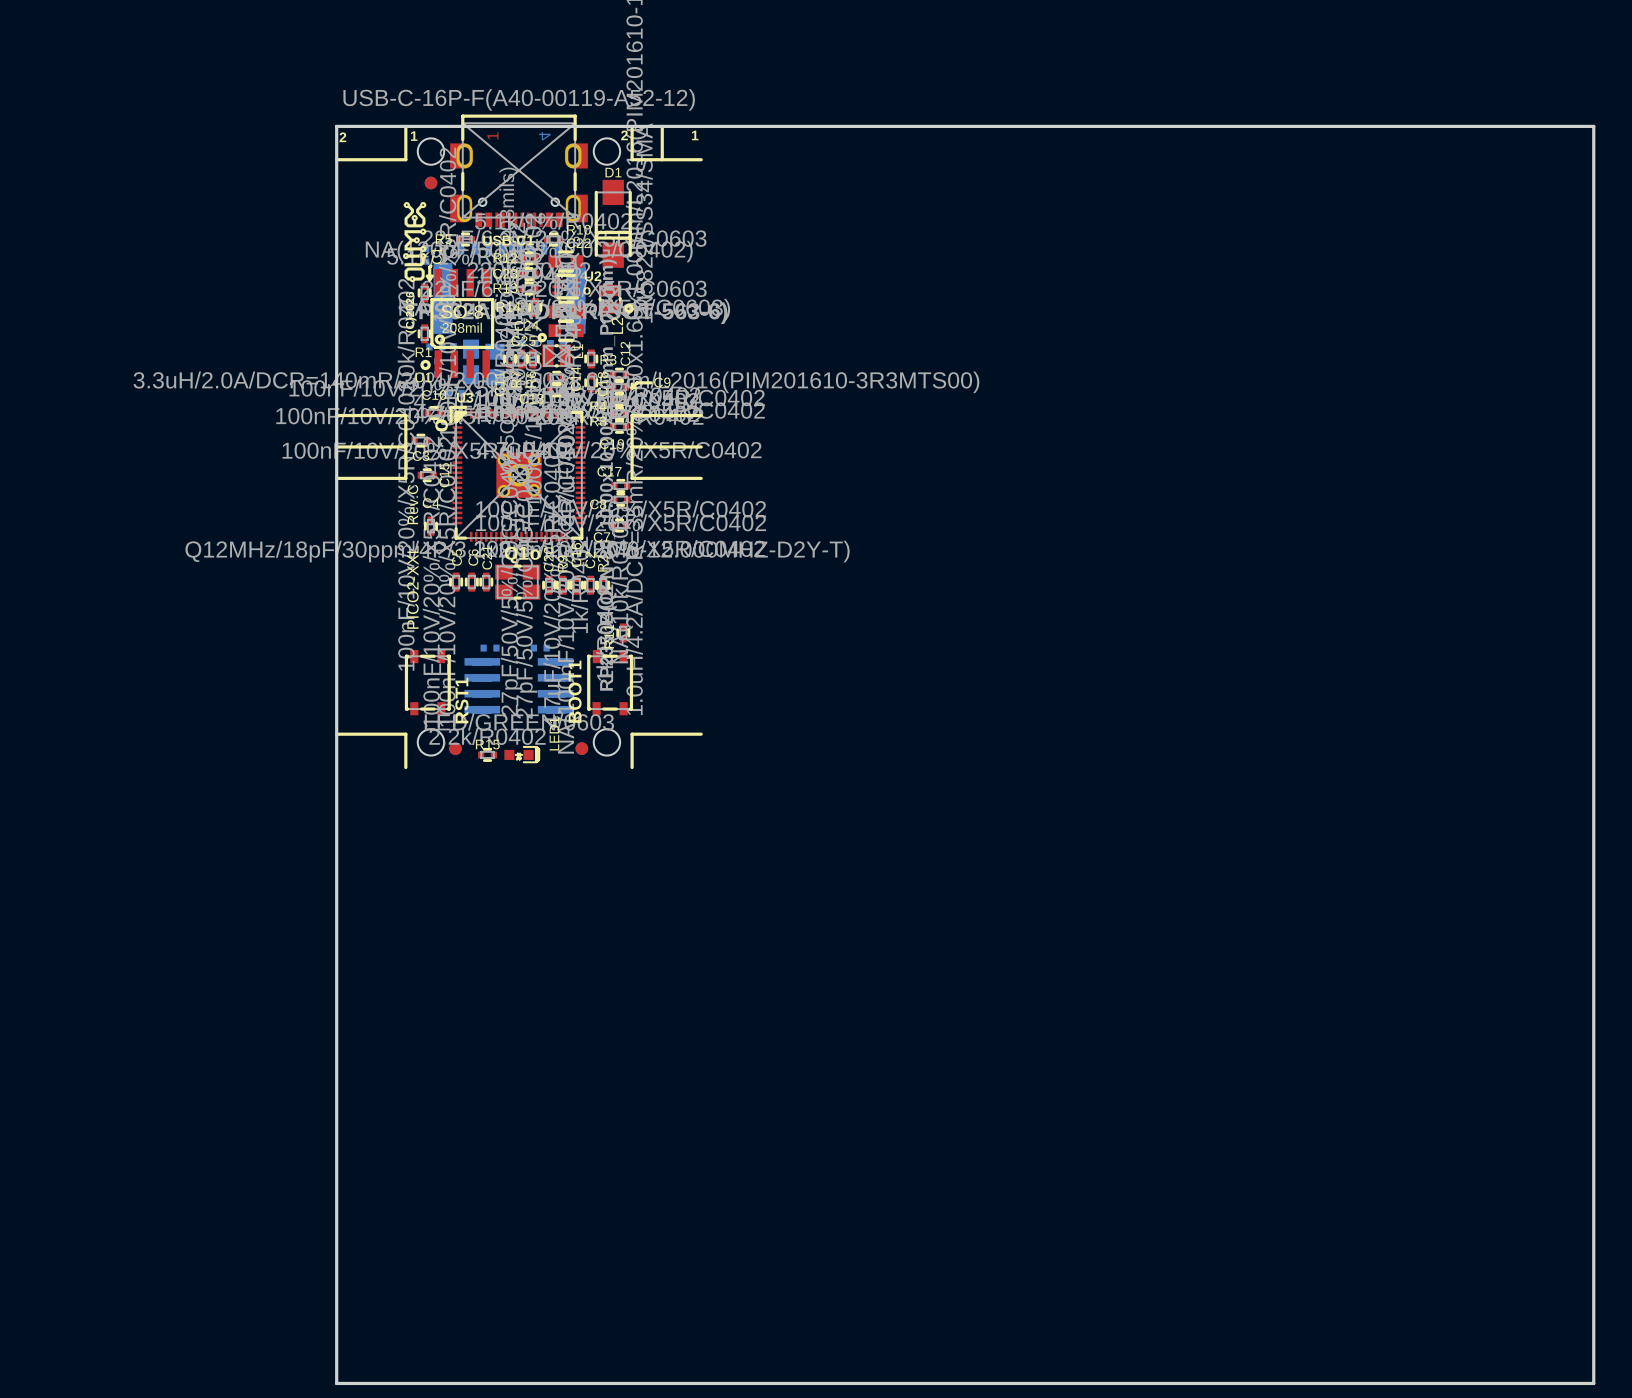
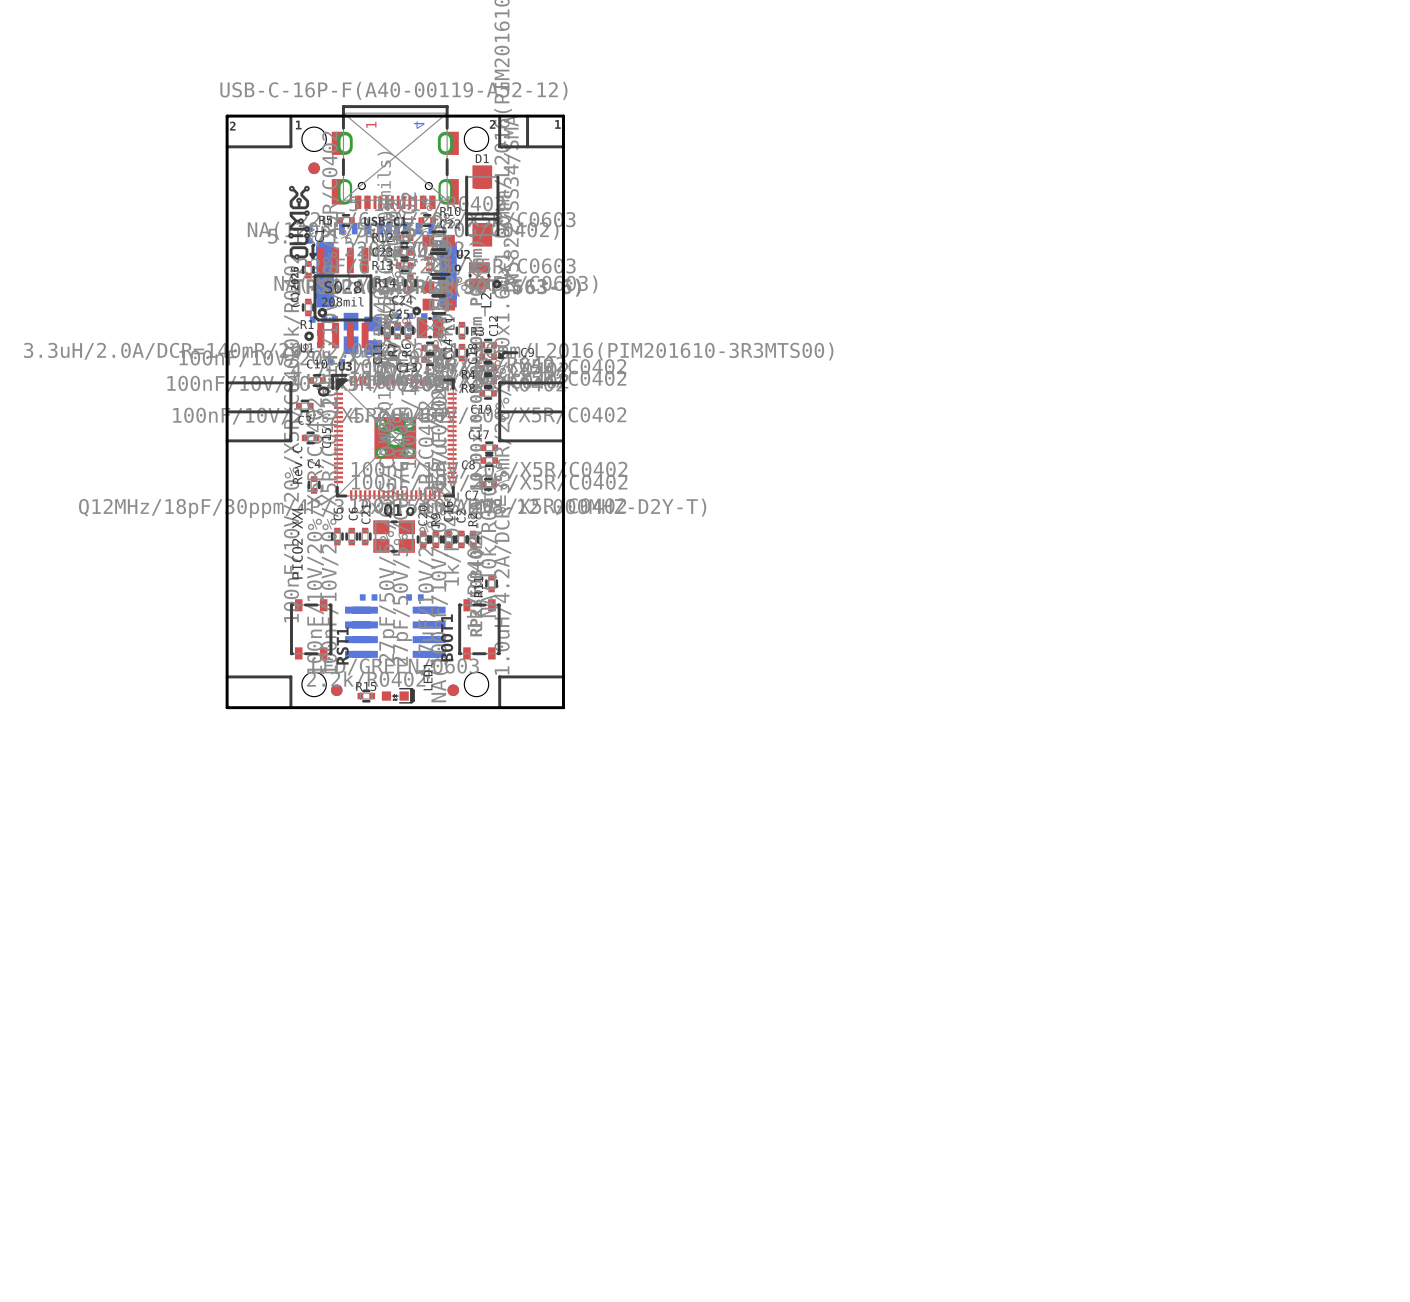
board edge: (701, 126) (1593, 126) (1593, 1383) (336, 1383) (336, 767) -> (563, 116) (563, 707) (227, 707)

